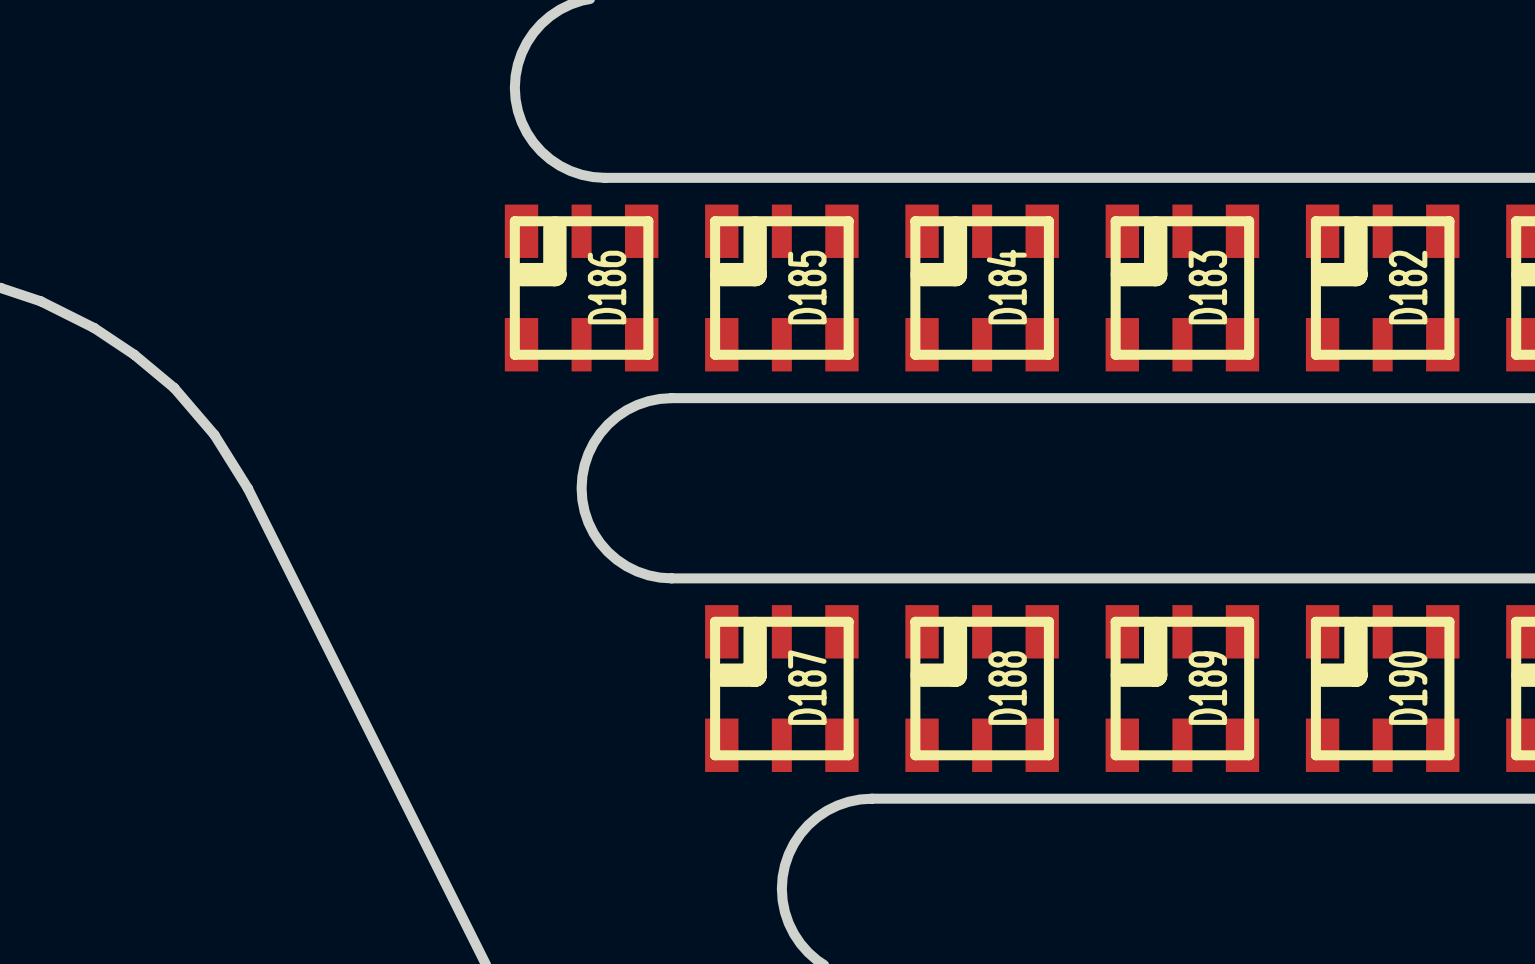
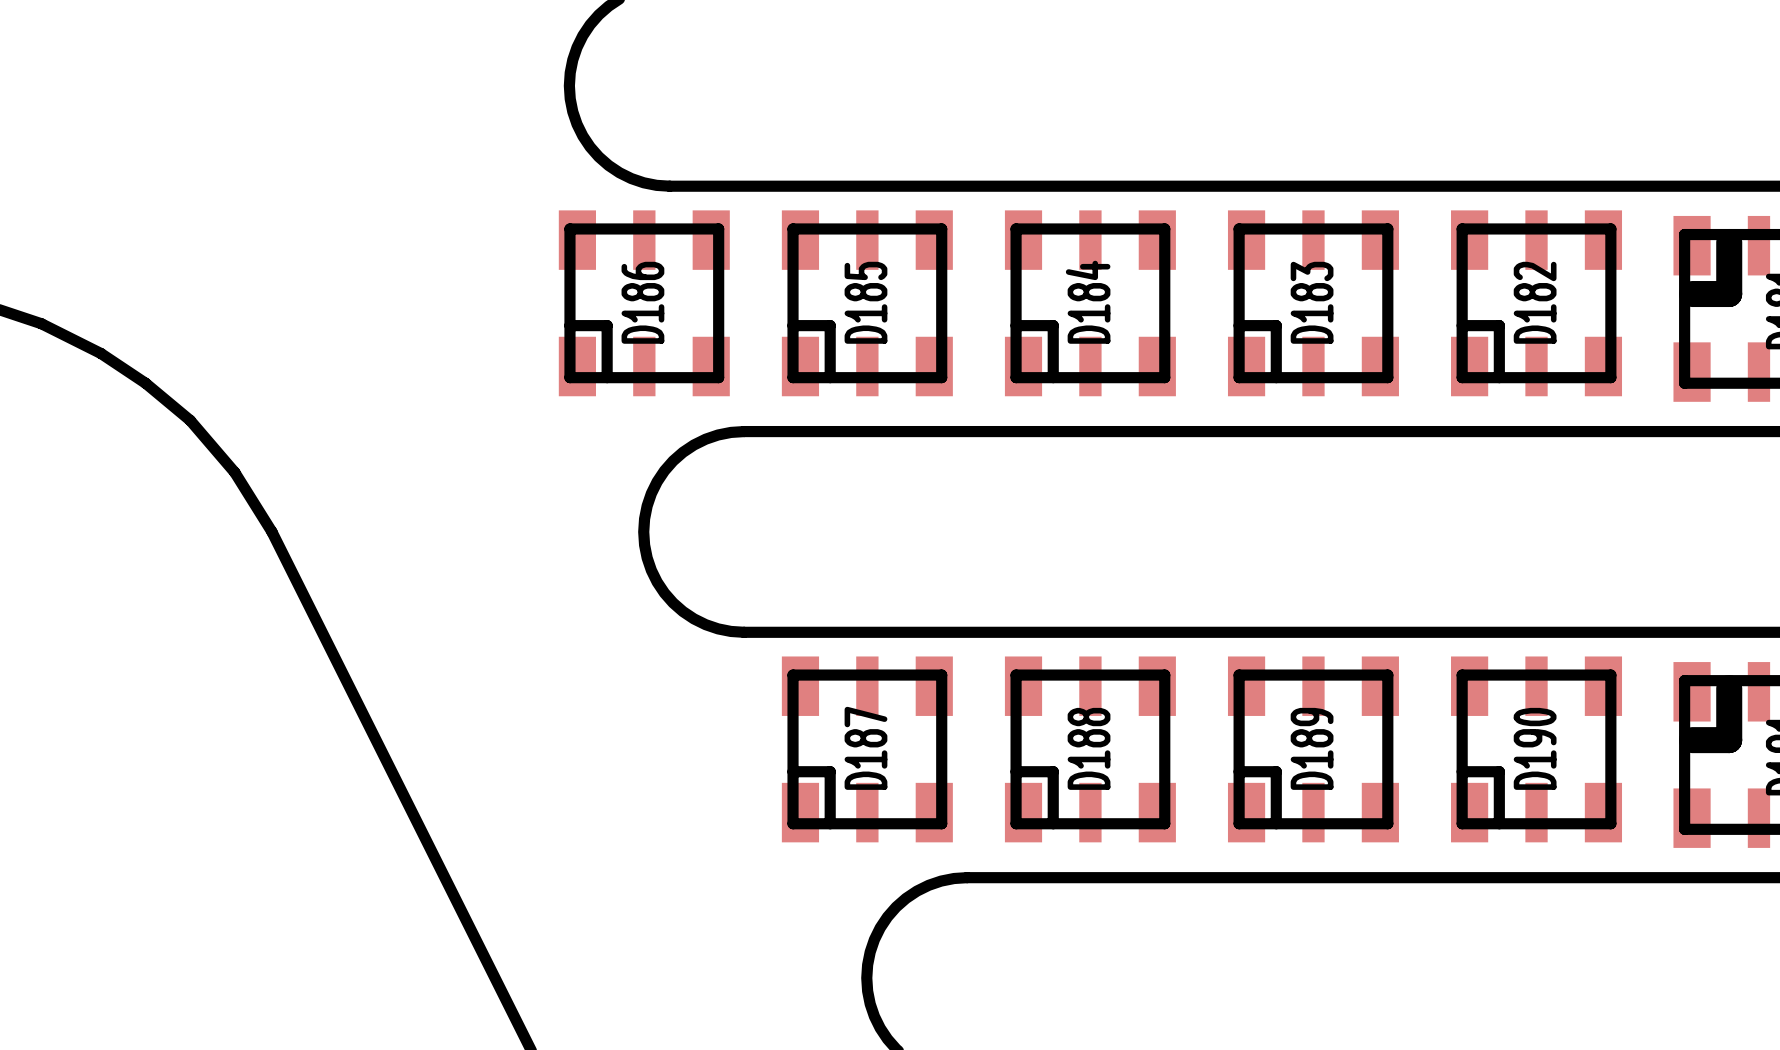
D186 footprint: [504, 204, 659, 372] -> [558, 210, 730, 397]
D185 footprint: [705, 204, 859, 372] -> [781, 210, 953, 397]
D184 footprint: [905, 204, 1059, 372] -> [1004, 210, 1176, 397]
D183 footprint: [1105, 204, 1260, 372] -> [1227, 210, 1399, 397]
D182 footprint: [1305, 204, 1460, 372] -> [1451, 210, 1623, 397]
D186 name position: D186 (607, 287) -> D186 (642, 302)
D185 name position: D185 (807, 287) -> D185 (865, 302)
D184 name position: D184 (1006, 287) -> D184 (1088, 302)
D183 name position: D183 (1207, 287) -> D183 (1312, 302)
D182 name position: D182 (1408, 287) -> D182 (1535, 302)
D187 footprint: [705, 605, 859, 772] -> [781, 656, 953, 843]
D188 footprint: [905, 605, 1059, 772] -> [1004, 656, 1176, 843]
D189 footprint: [1105, 605, 1260, 772] -> [1227, 656, 1399, 843]
D190 footprint: [1305, 605, 1460, 772] -> [1451, 656, 1623, 843]
D187 name position: D187 (807, 687) -> D187 (865, 748)
D188 name position: D188 (1007, 688) -> D188 (1089, 748)
D189 name position: D189 (1207, 688) -> D189 (1312, 748)
D190 name position: D190 (1408, 688) -> D190 (1535, 748)

